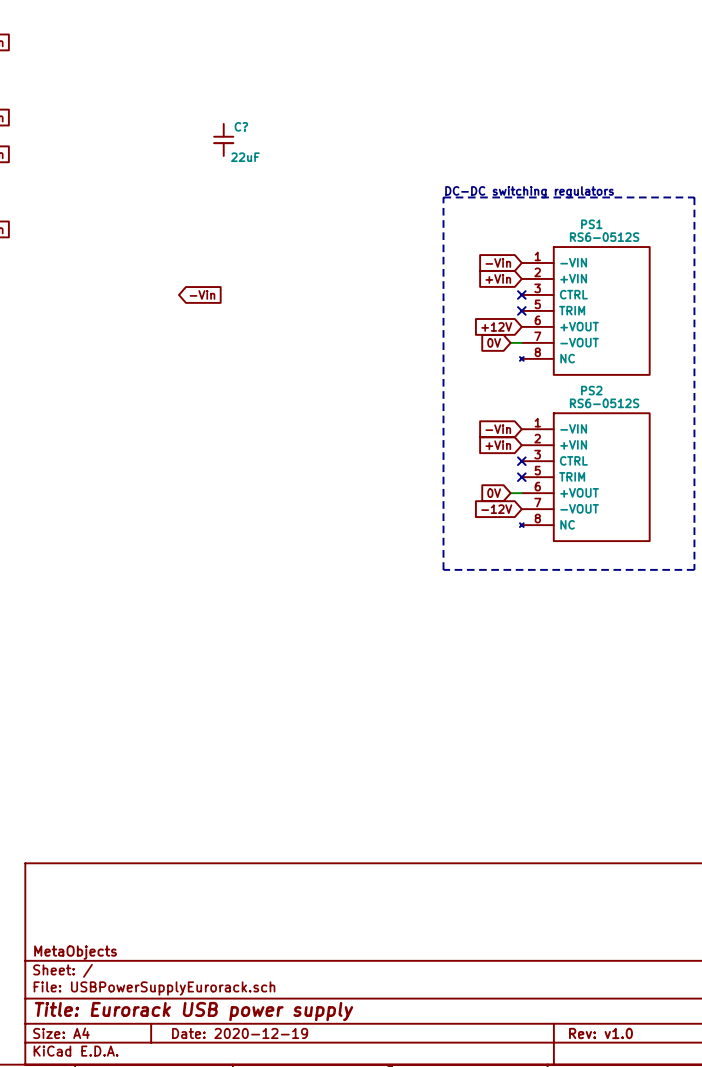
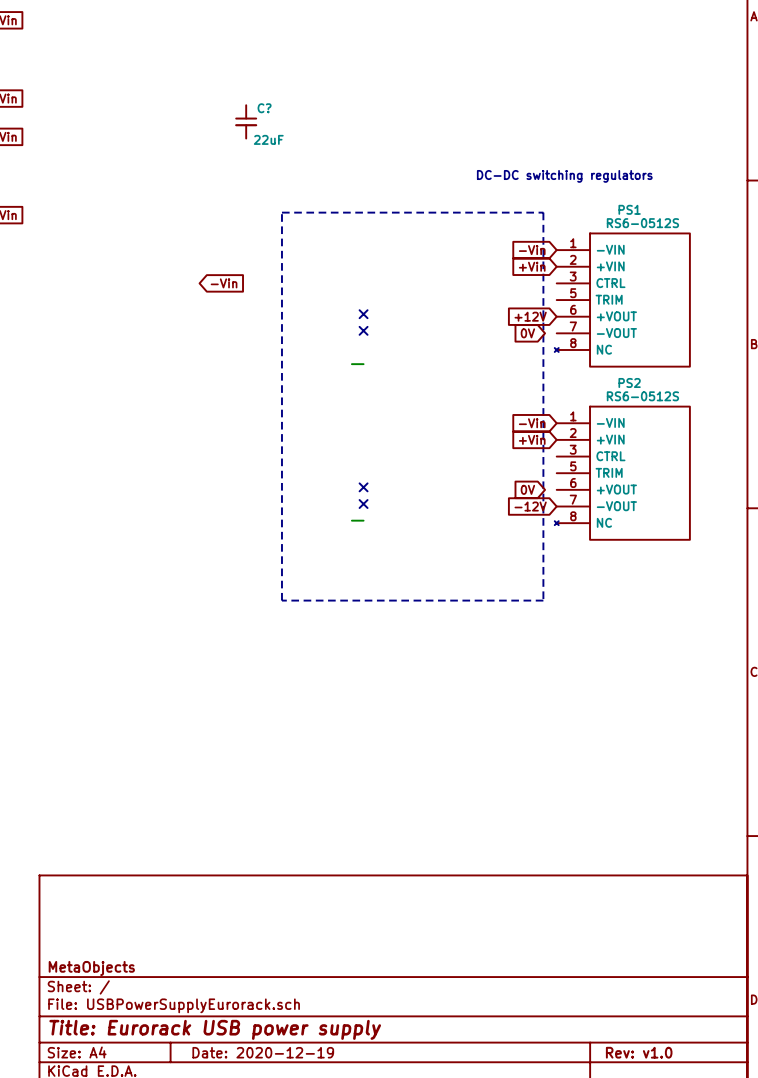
line: (443, 197) (694, 197) (694, 569) (443, 569) (443, 197) -> none
line: none -> (281, 212) (543, 212) (543, 600) (281, 600) (281, 212)
no-connect mark: (521, 294) -> none
no-connect mark: (521, 310) -> none
no-connect mark: none -> (363, 314)
no-connect mark: none -> (363, 330)
wire: (510, 342) (521, 342) -> none
wire: none -> (351, 364) (363, 364)
no-connect mark: (521, 461) -> none
no-connect mark: (521, 477) -> none
no-connect mark: none -> (363, 487)
wire: (510, 493) (521, 493) -> none
no-connect mark: none -> (363, 504)
wire: none -> (351, 520) (363, 520)

